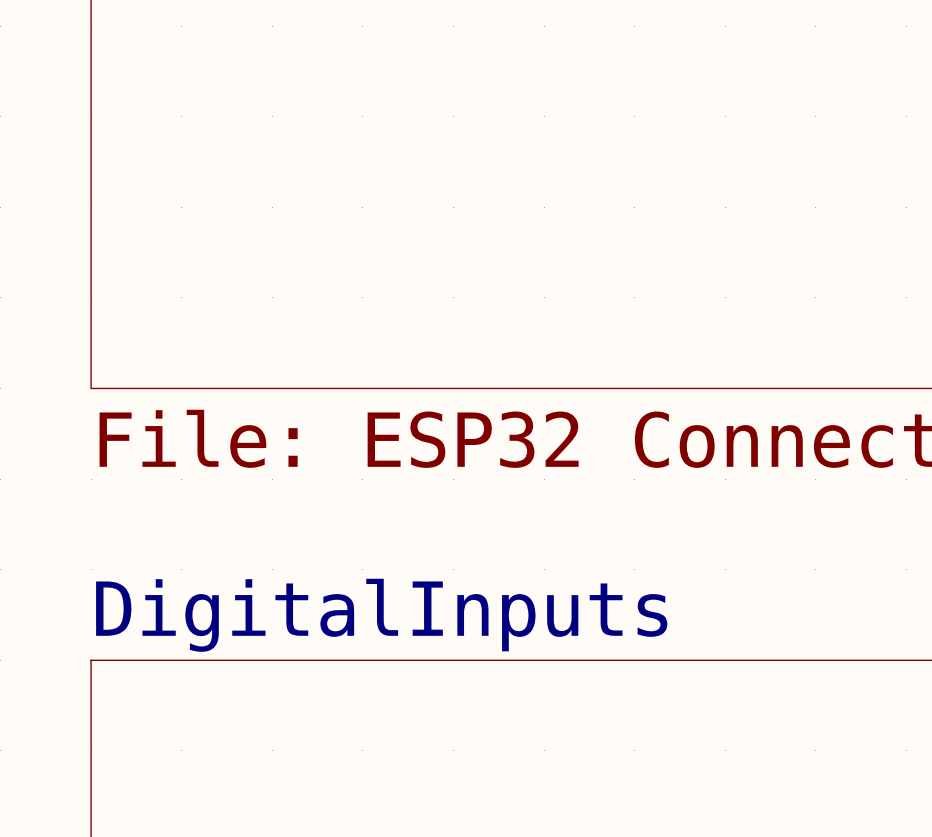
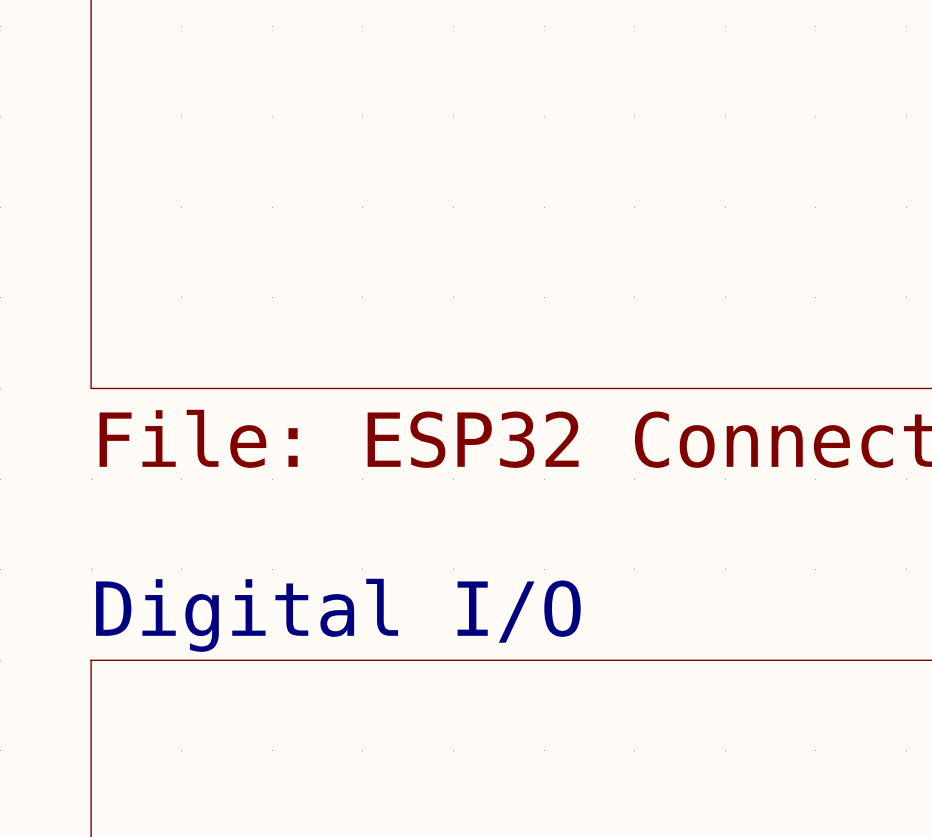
sheet DigitalInputs name: DigitalInputs (381, 615) -> Digital I/O (338, 615)

